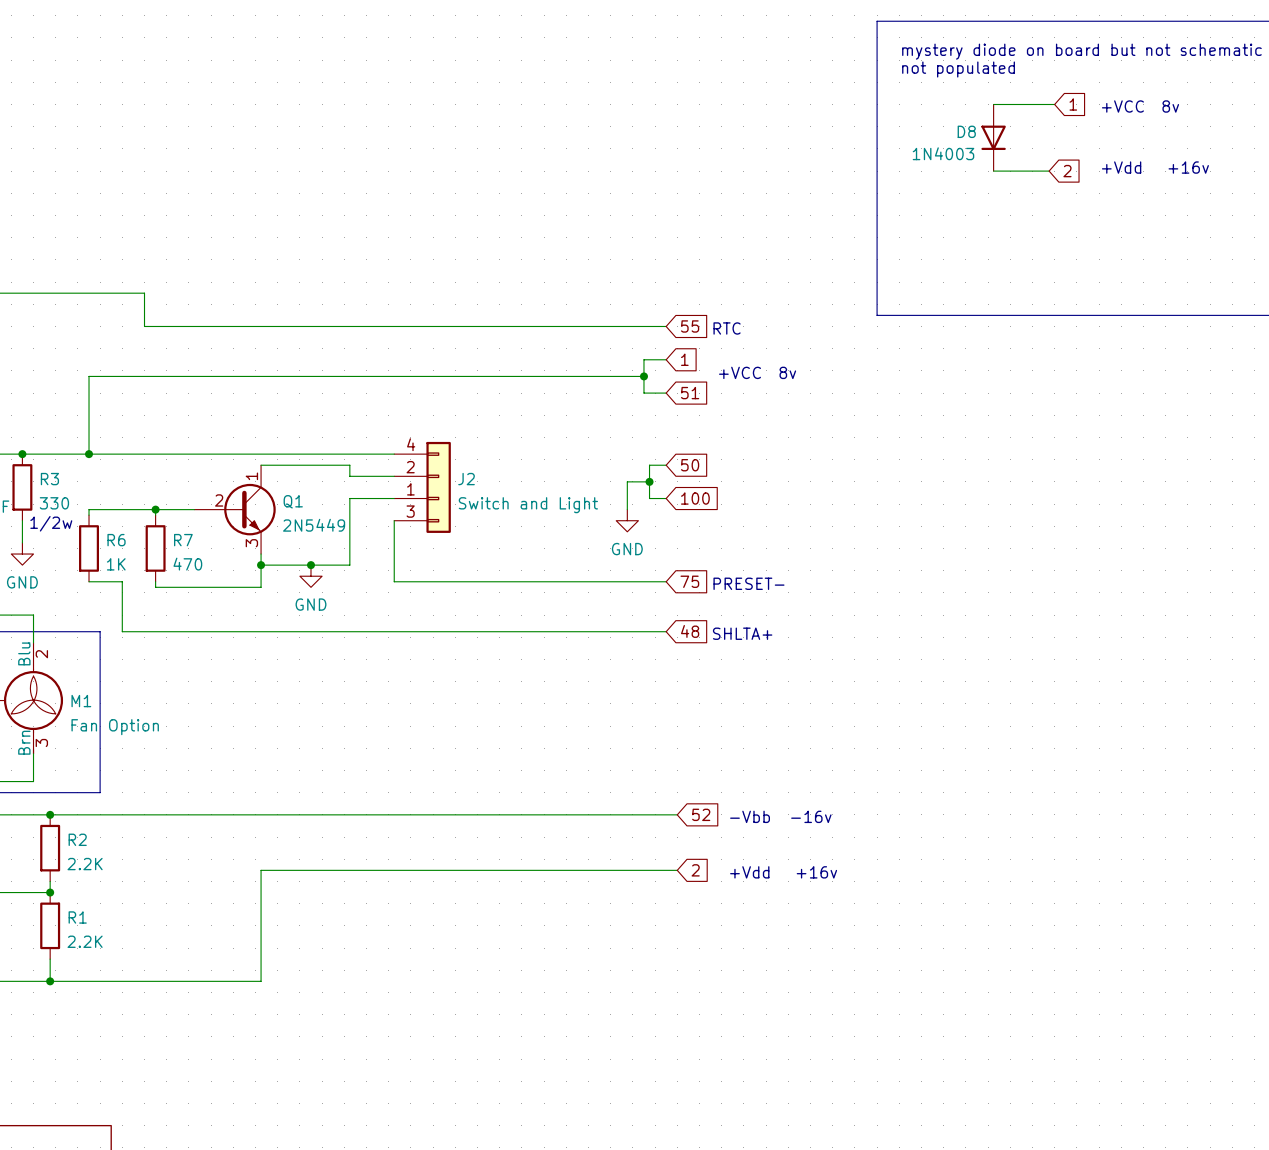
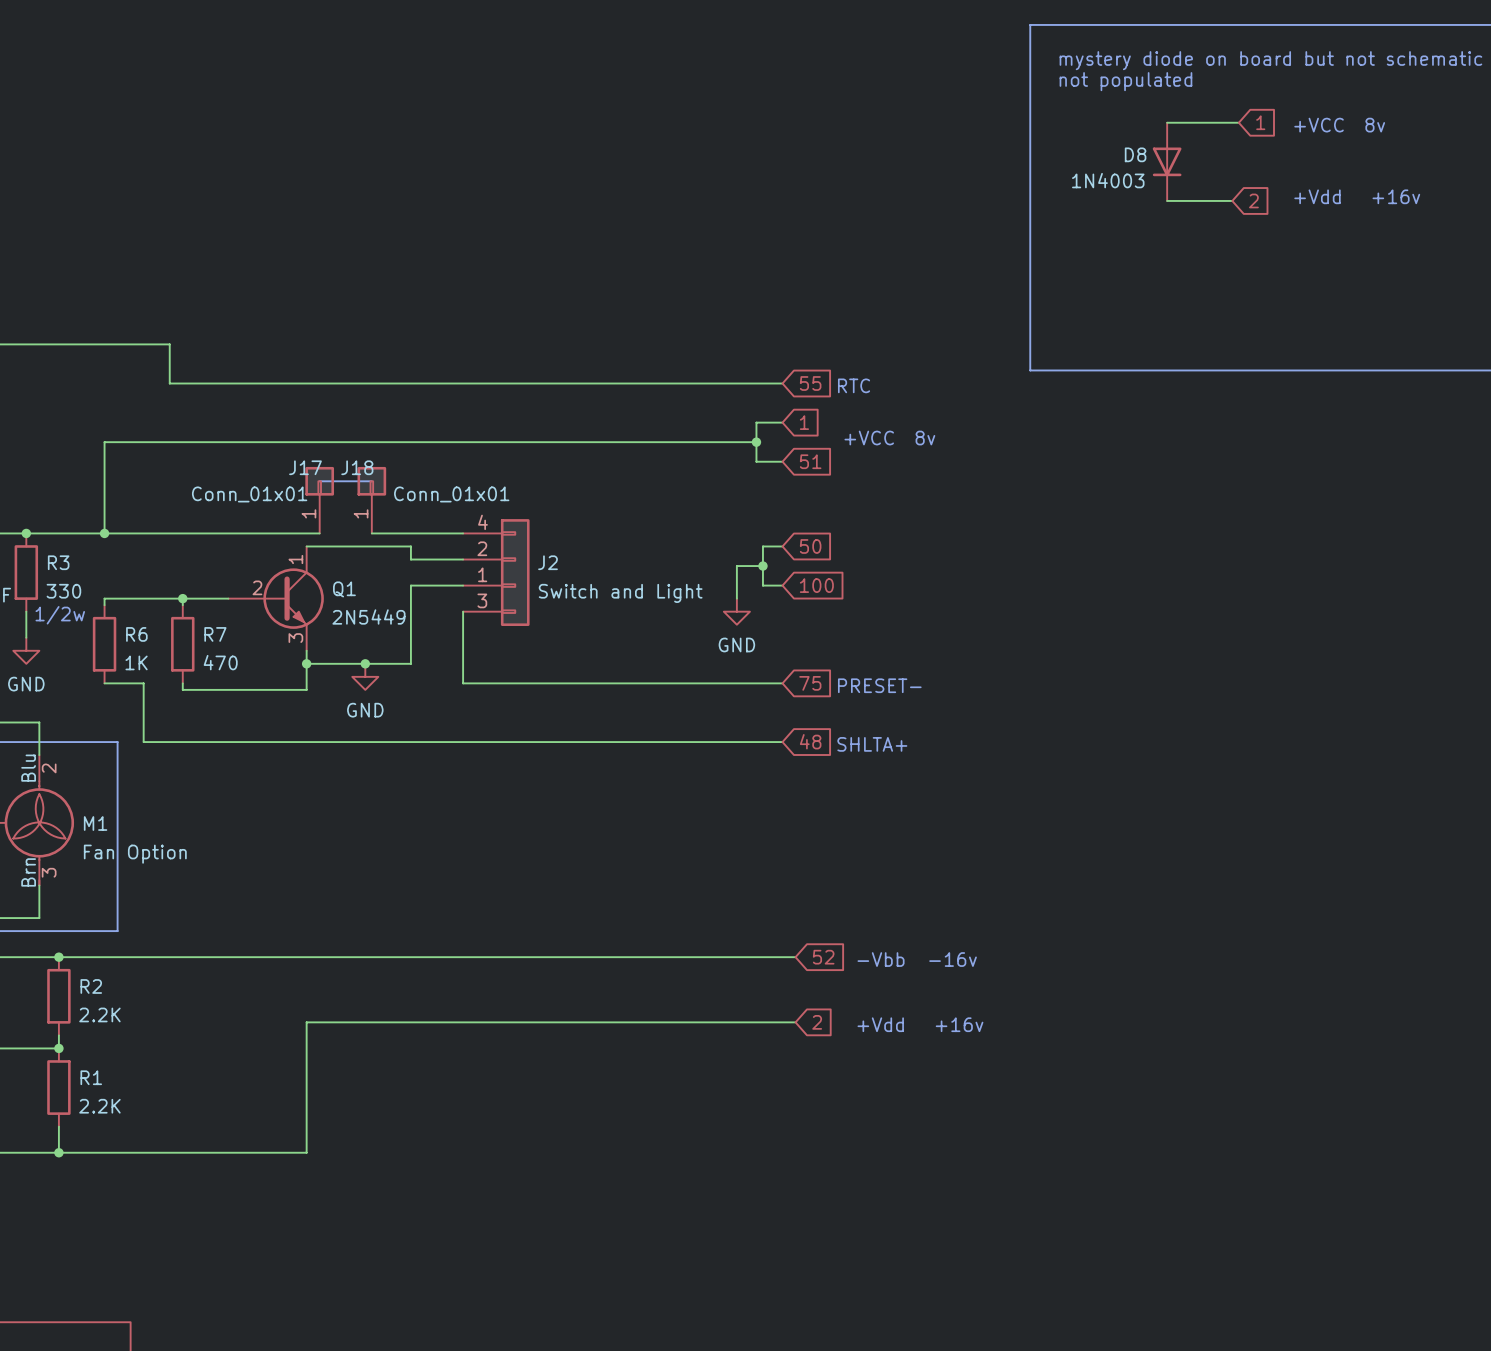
line: none -> (319, 481) (371, 481)
J17: none -> Conn_01x01 (319, 500)
J18: none -> Conn_01x01 (371, 500)
wire: (272, 454) (316, 454) -> none

